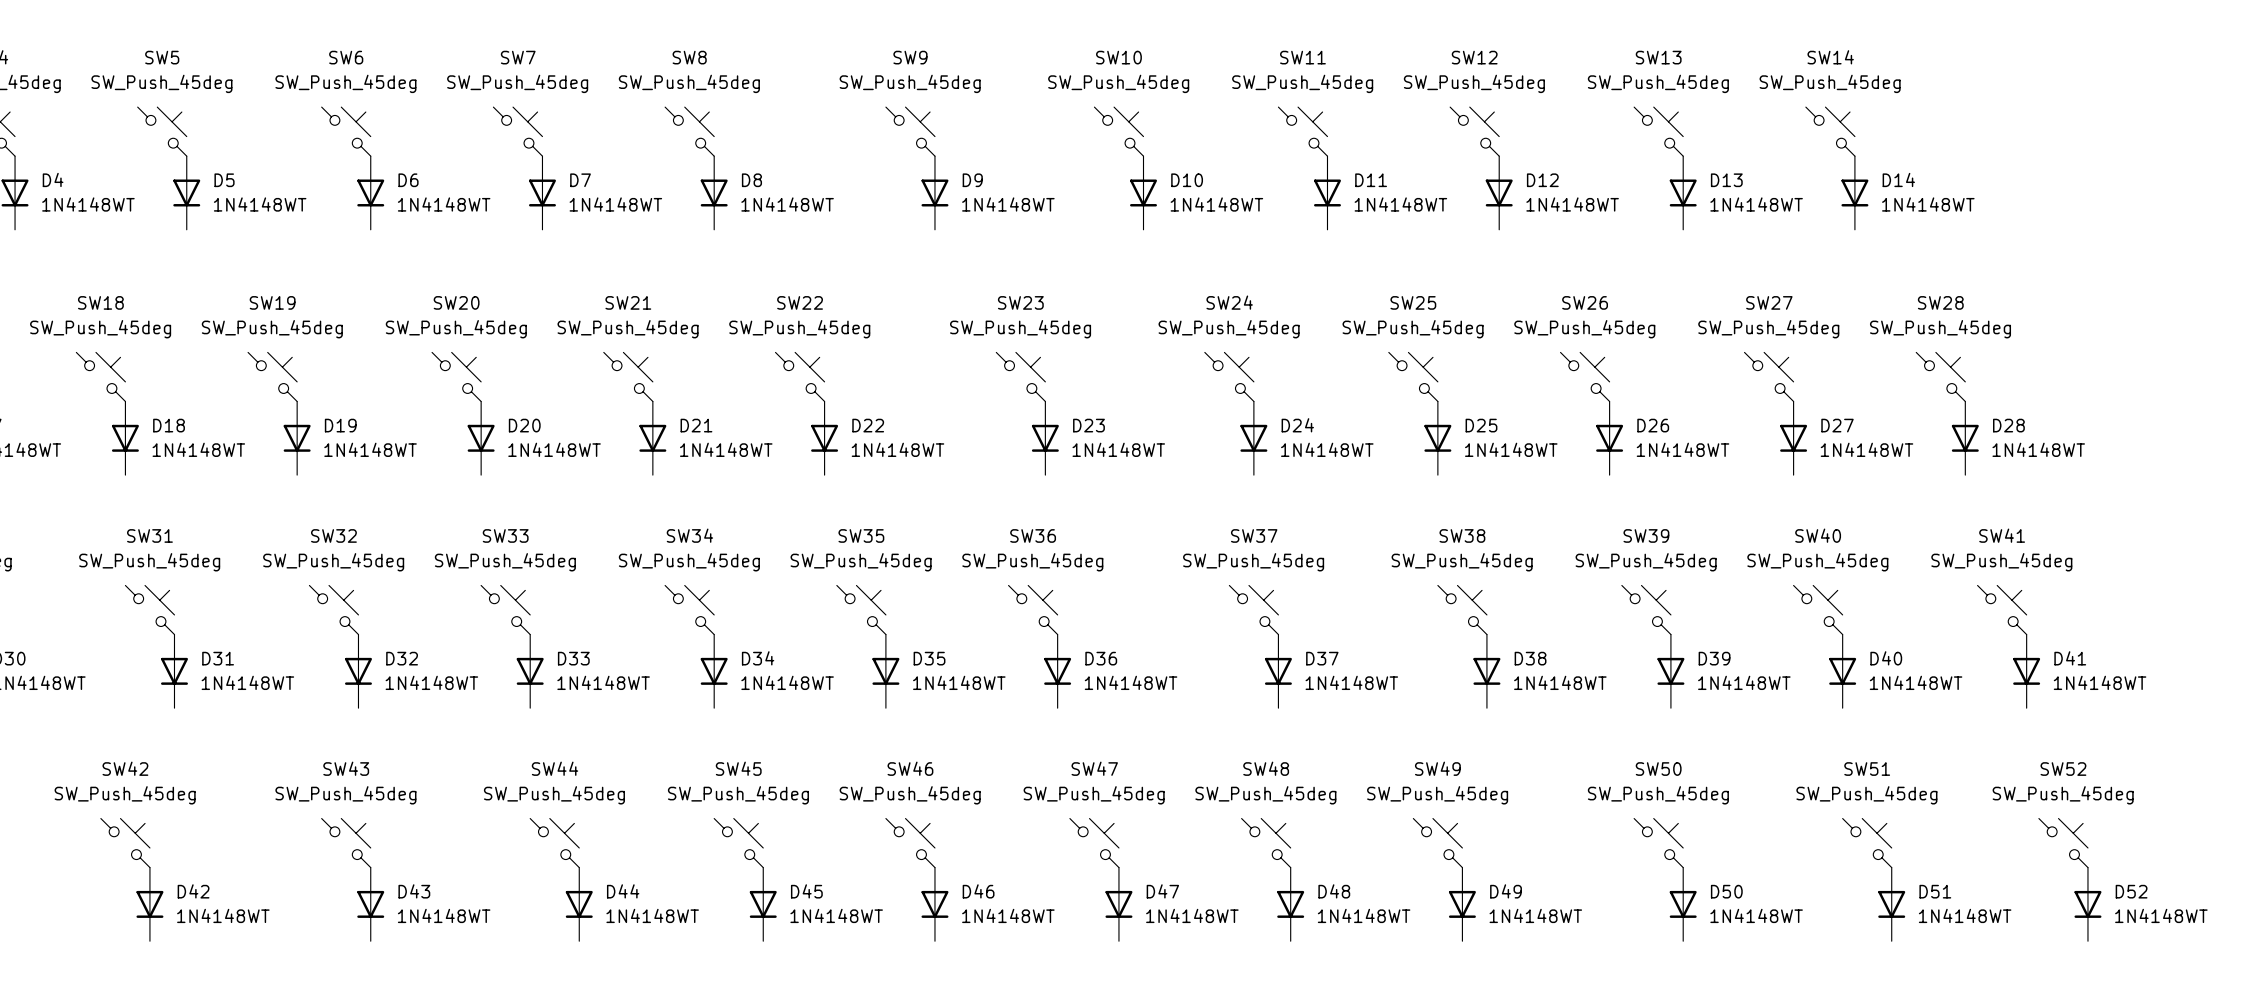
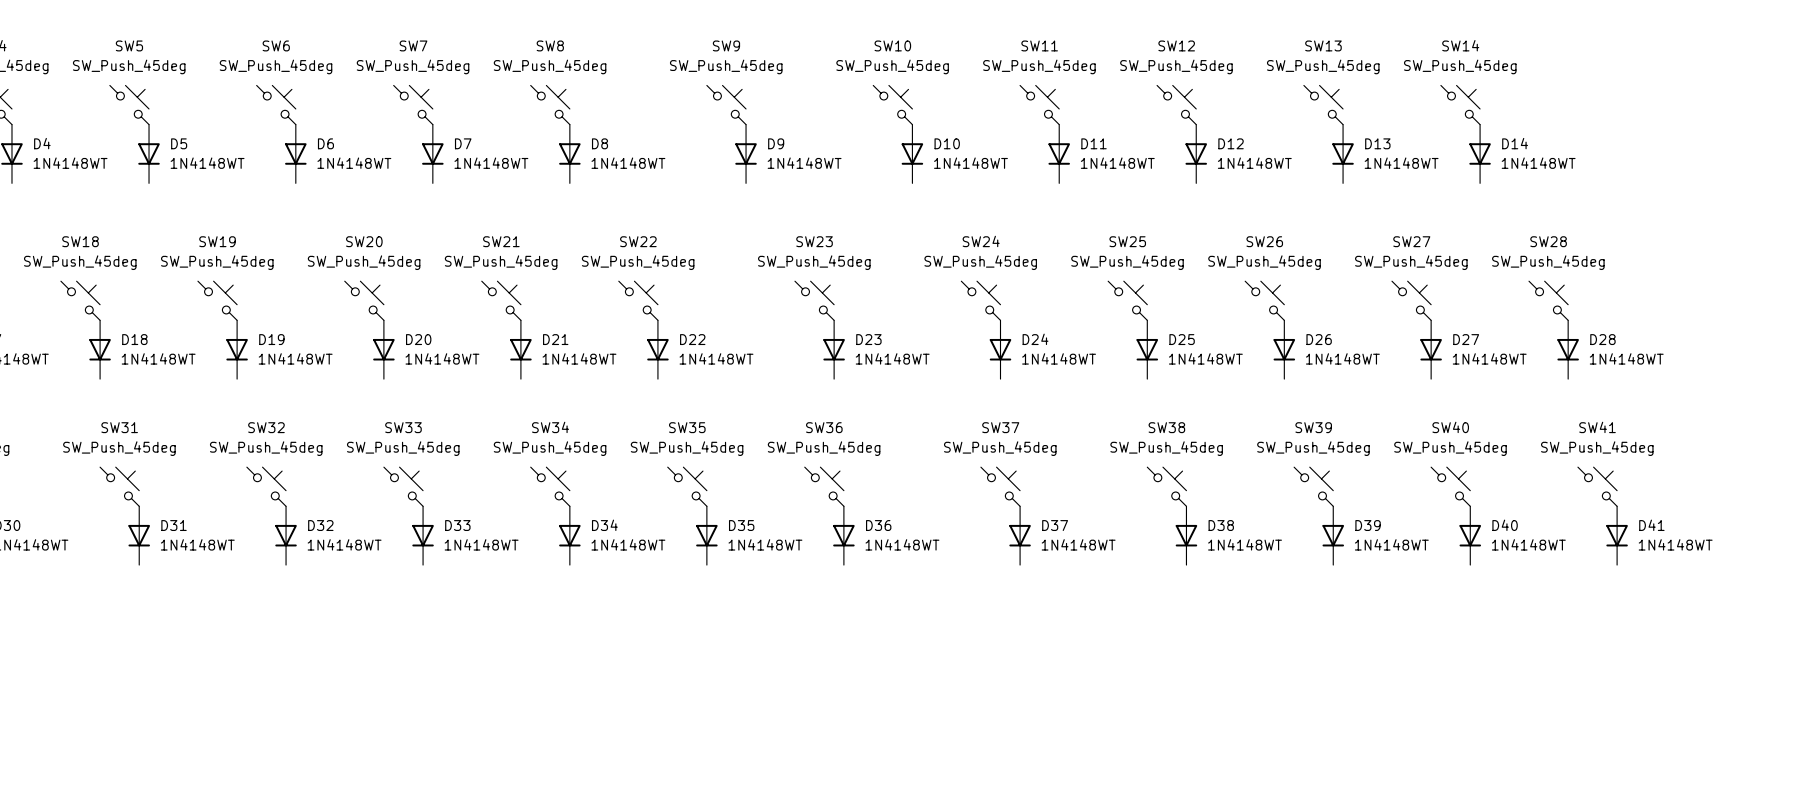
SW42: SW_Push_45deg (125, 843) -> none
SW43: SW_Push_45deg (346, 843) -> none
SW44: SW_Push_45deg (554, 843) -> none
SW45: SW_Push_45deg (738, 843) -> none
SW46: SW_Push_45deg (910, 843) -> none
SW47: SW_Push_45deg (1094, 843) -> none
SW48: SW_Push_45deg (1266, 843) -> none
SW49: SW_Push_45deg (1437, 843) -> none
SW50: SW_Push_45deg (1658, 843) -> none
SW51: SW_Push_45deg (1867, 843) -> none
SW52: SW_Push_45deg (2063, 843) -> none
D42: 1N4148WT (149, 904) -> none
D43: 1N4148WT (370, 904) -> none
D44: 1N4148WT (579, 904) -> none
D45: 1N4148WT (763, 904) -> none
D46: 1N4148WT (934, 904) -> none
D47: 1N4148WT (1118, 904) -> none
D48: 1N4148WT (1290, 904) -> none
D49: 1N4148WT (1462, 904) -> none
D50: 1N4148WT (1683, 904) -> none
D51: 1N4148WT (1891, 904) -> none
D52: 1N4148WT (2087, 904) -> none

